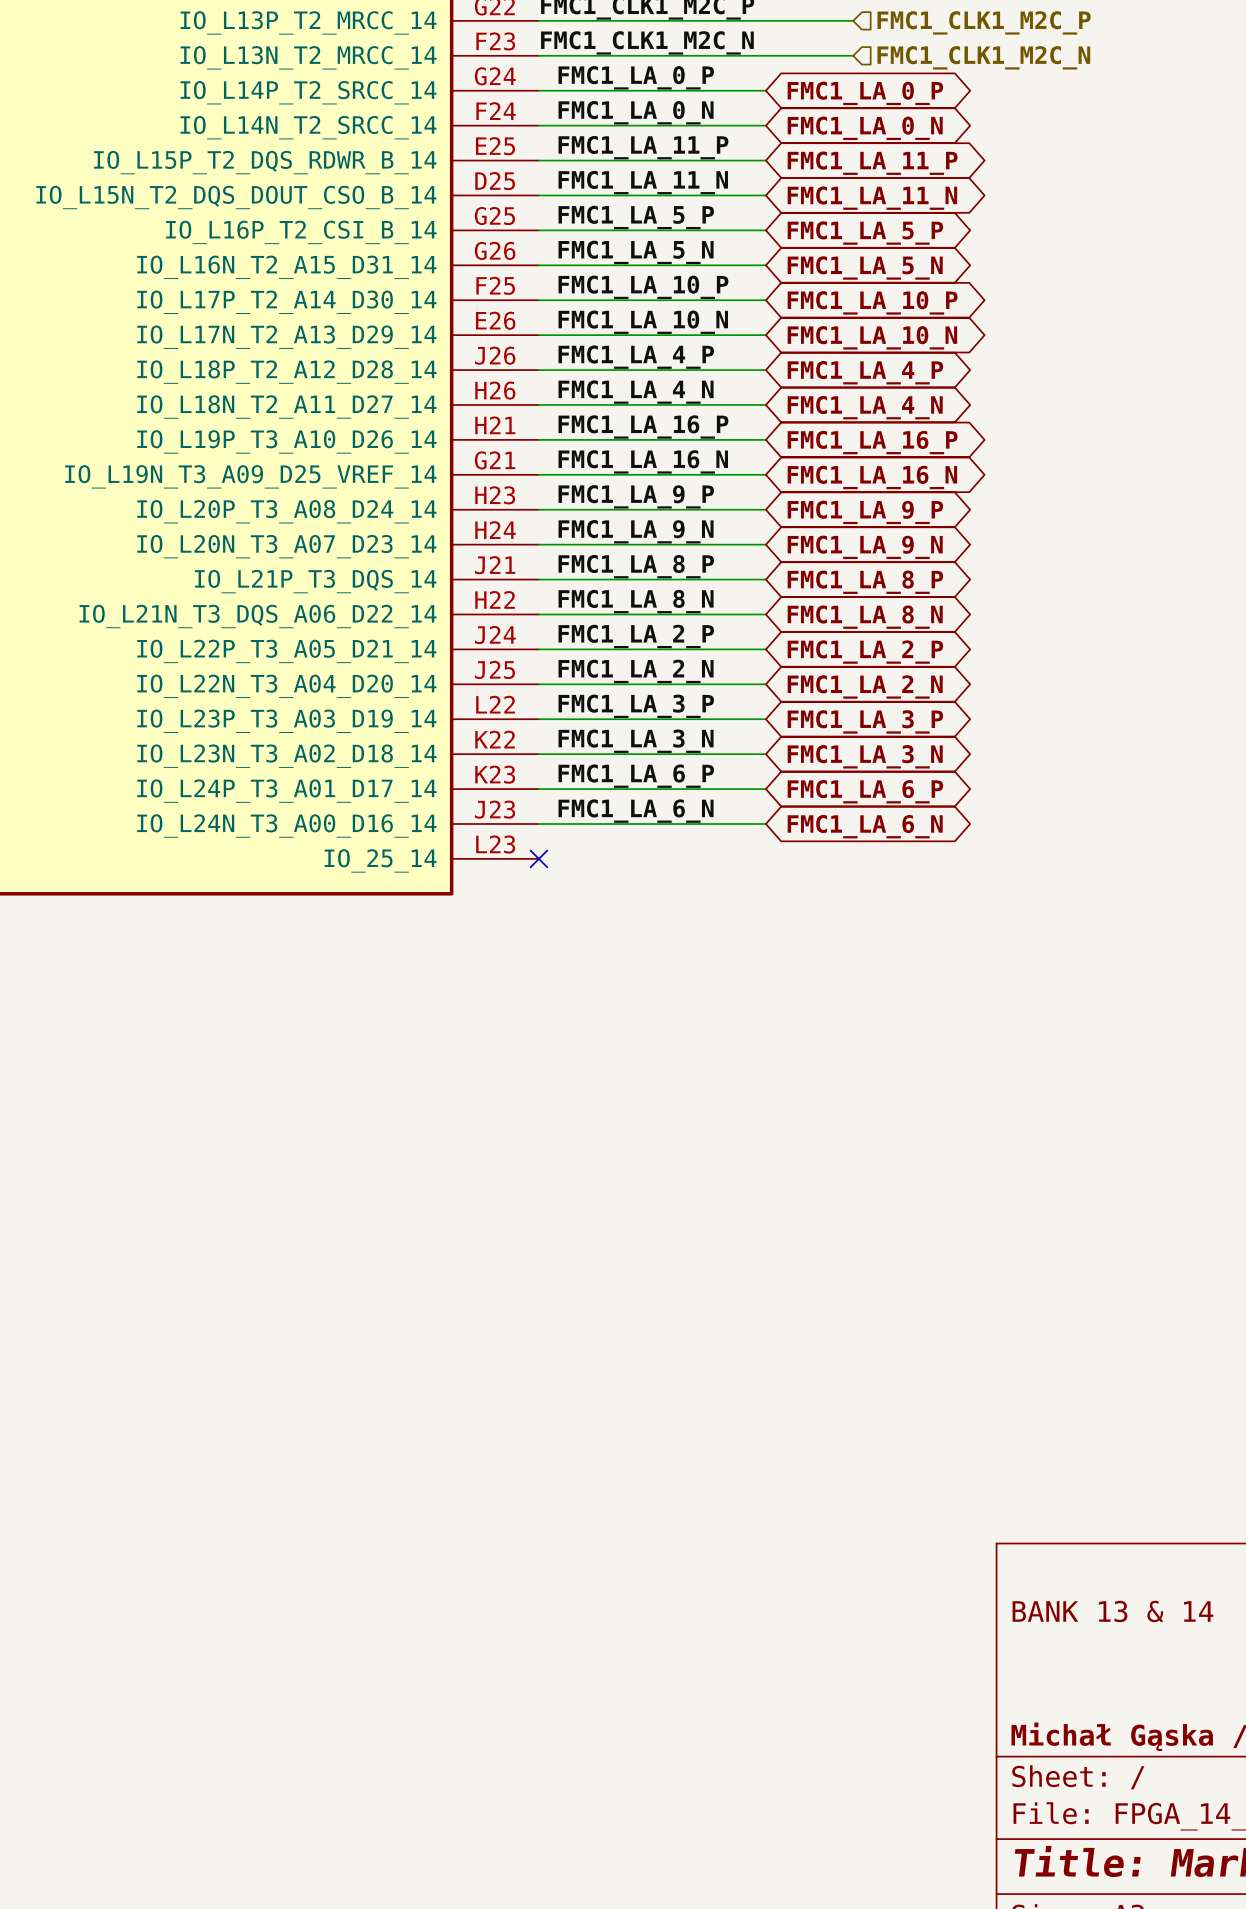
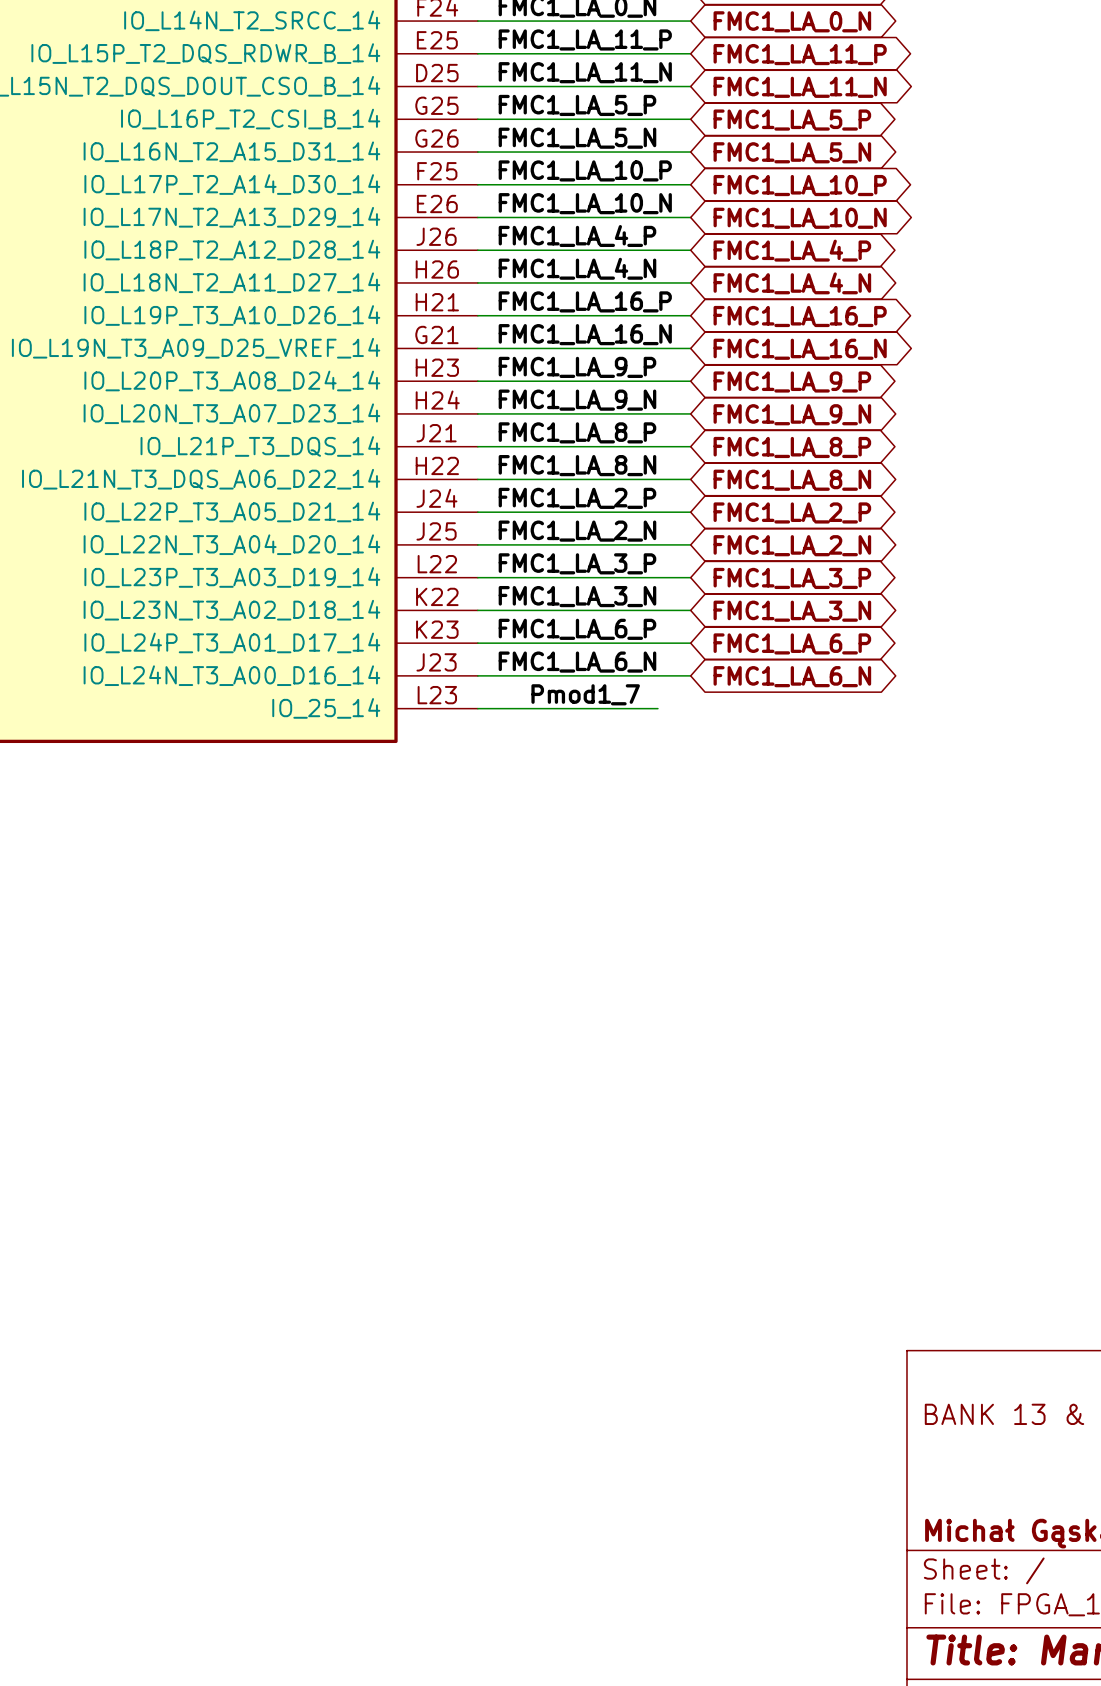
label: none -> Pmod1_7 (585, 694)
wire: none -> (477, 708) (657, 708)
no-connect mark: (538, 858) -> none

